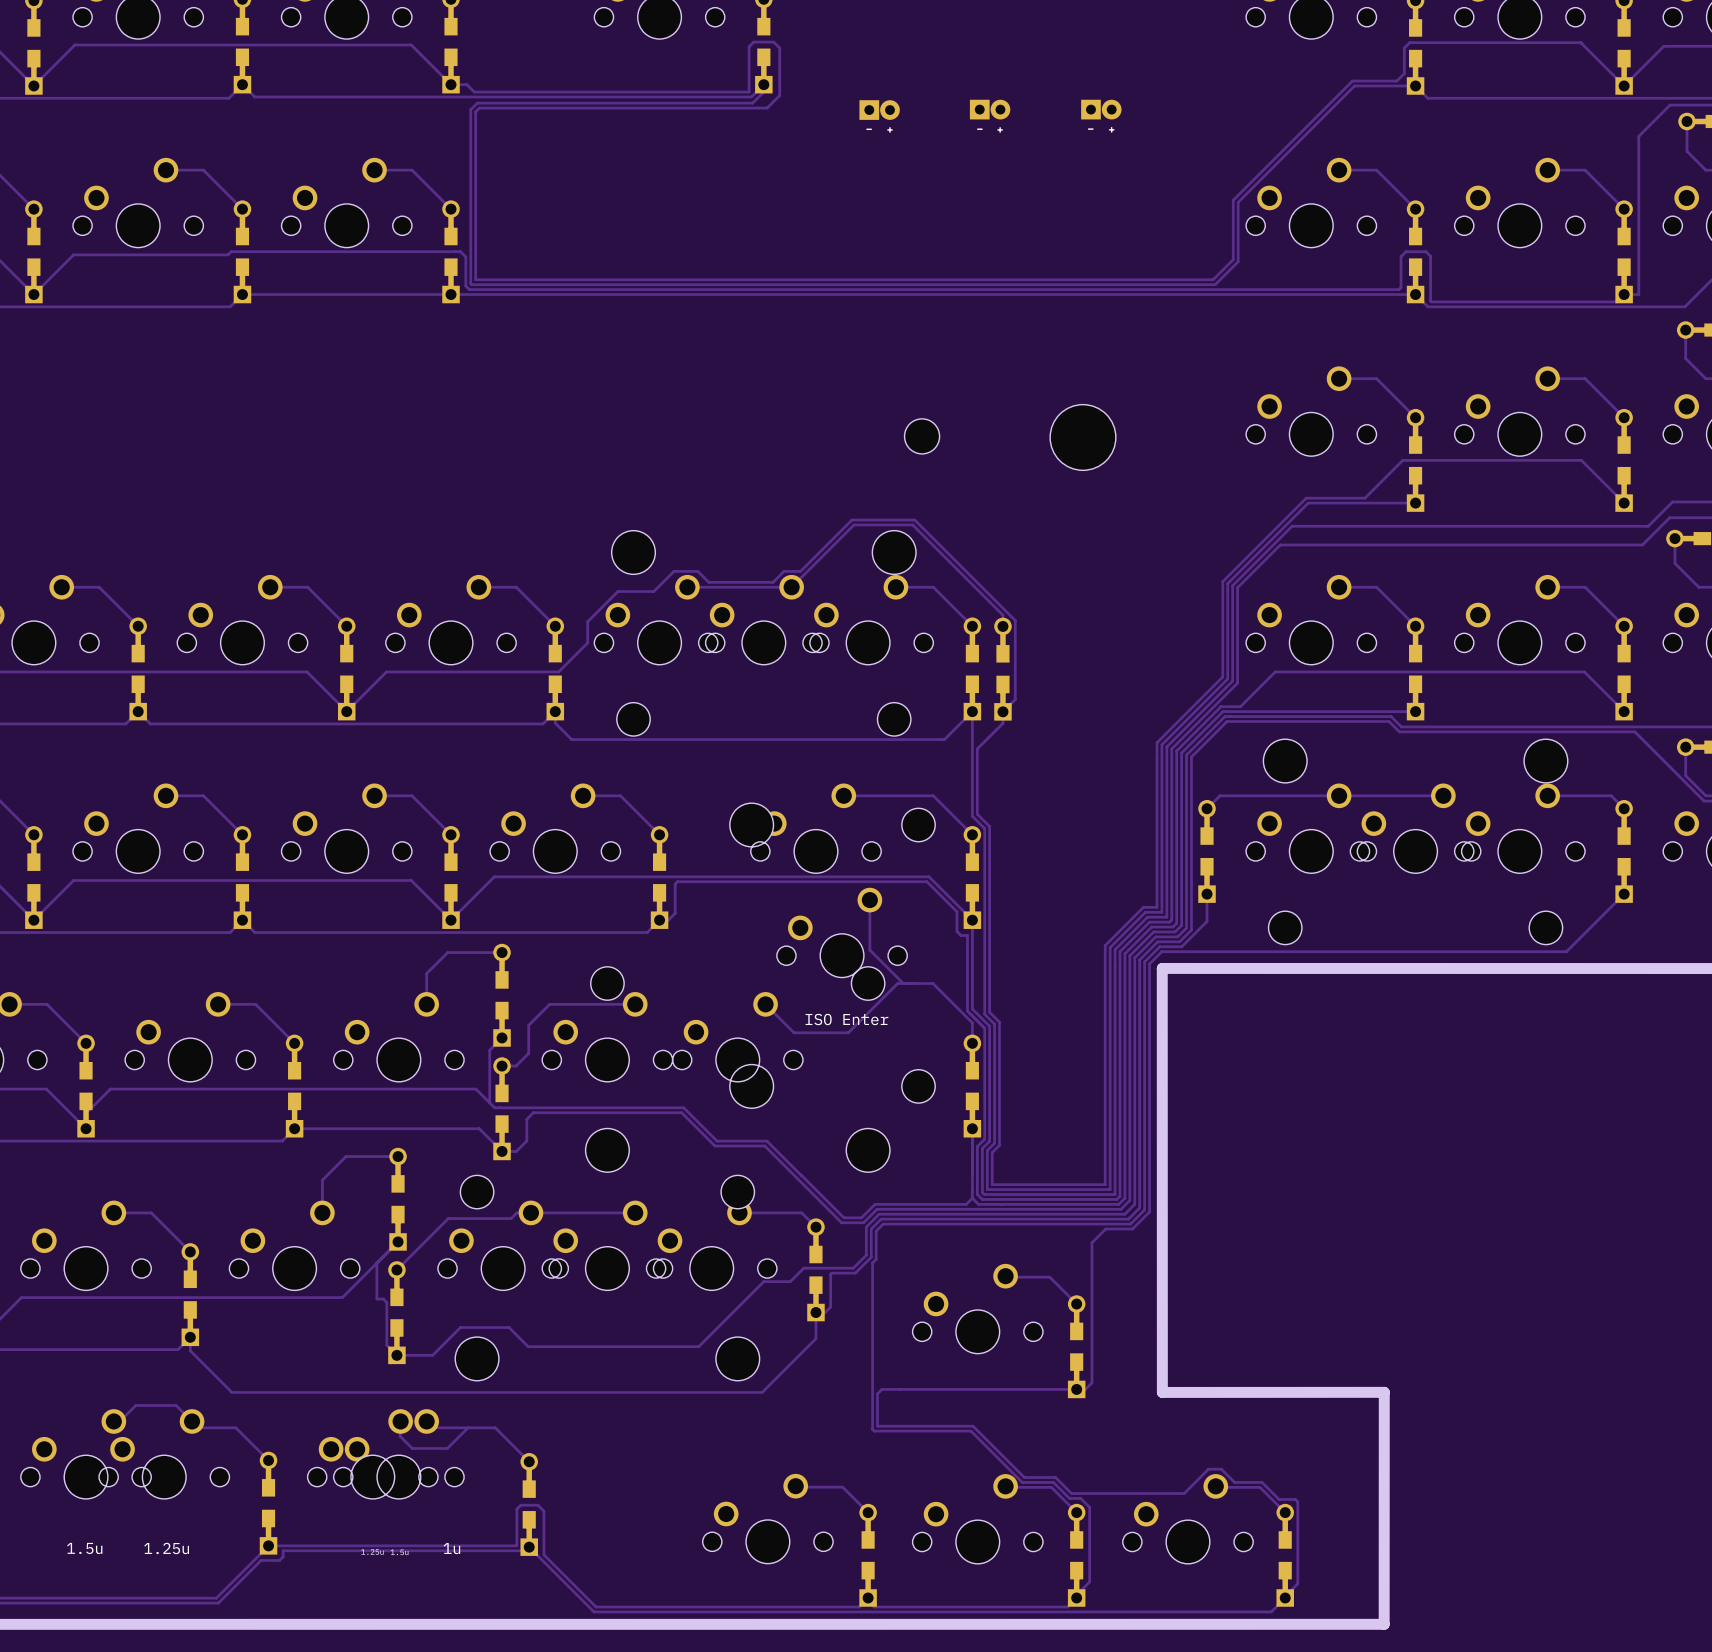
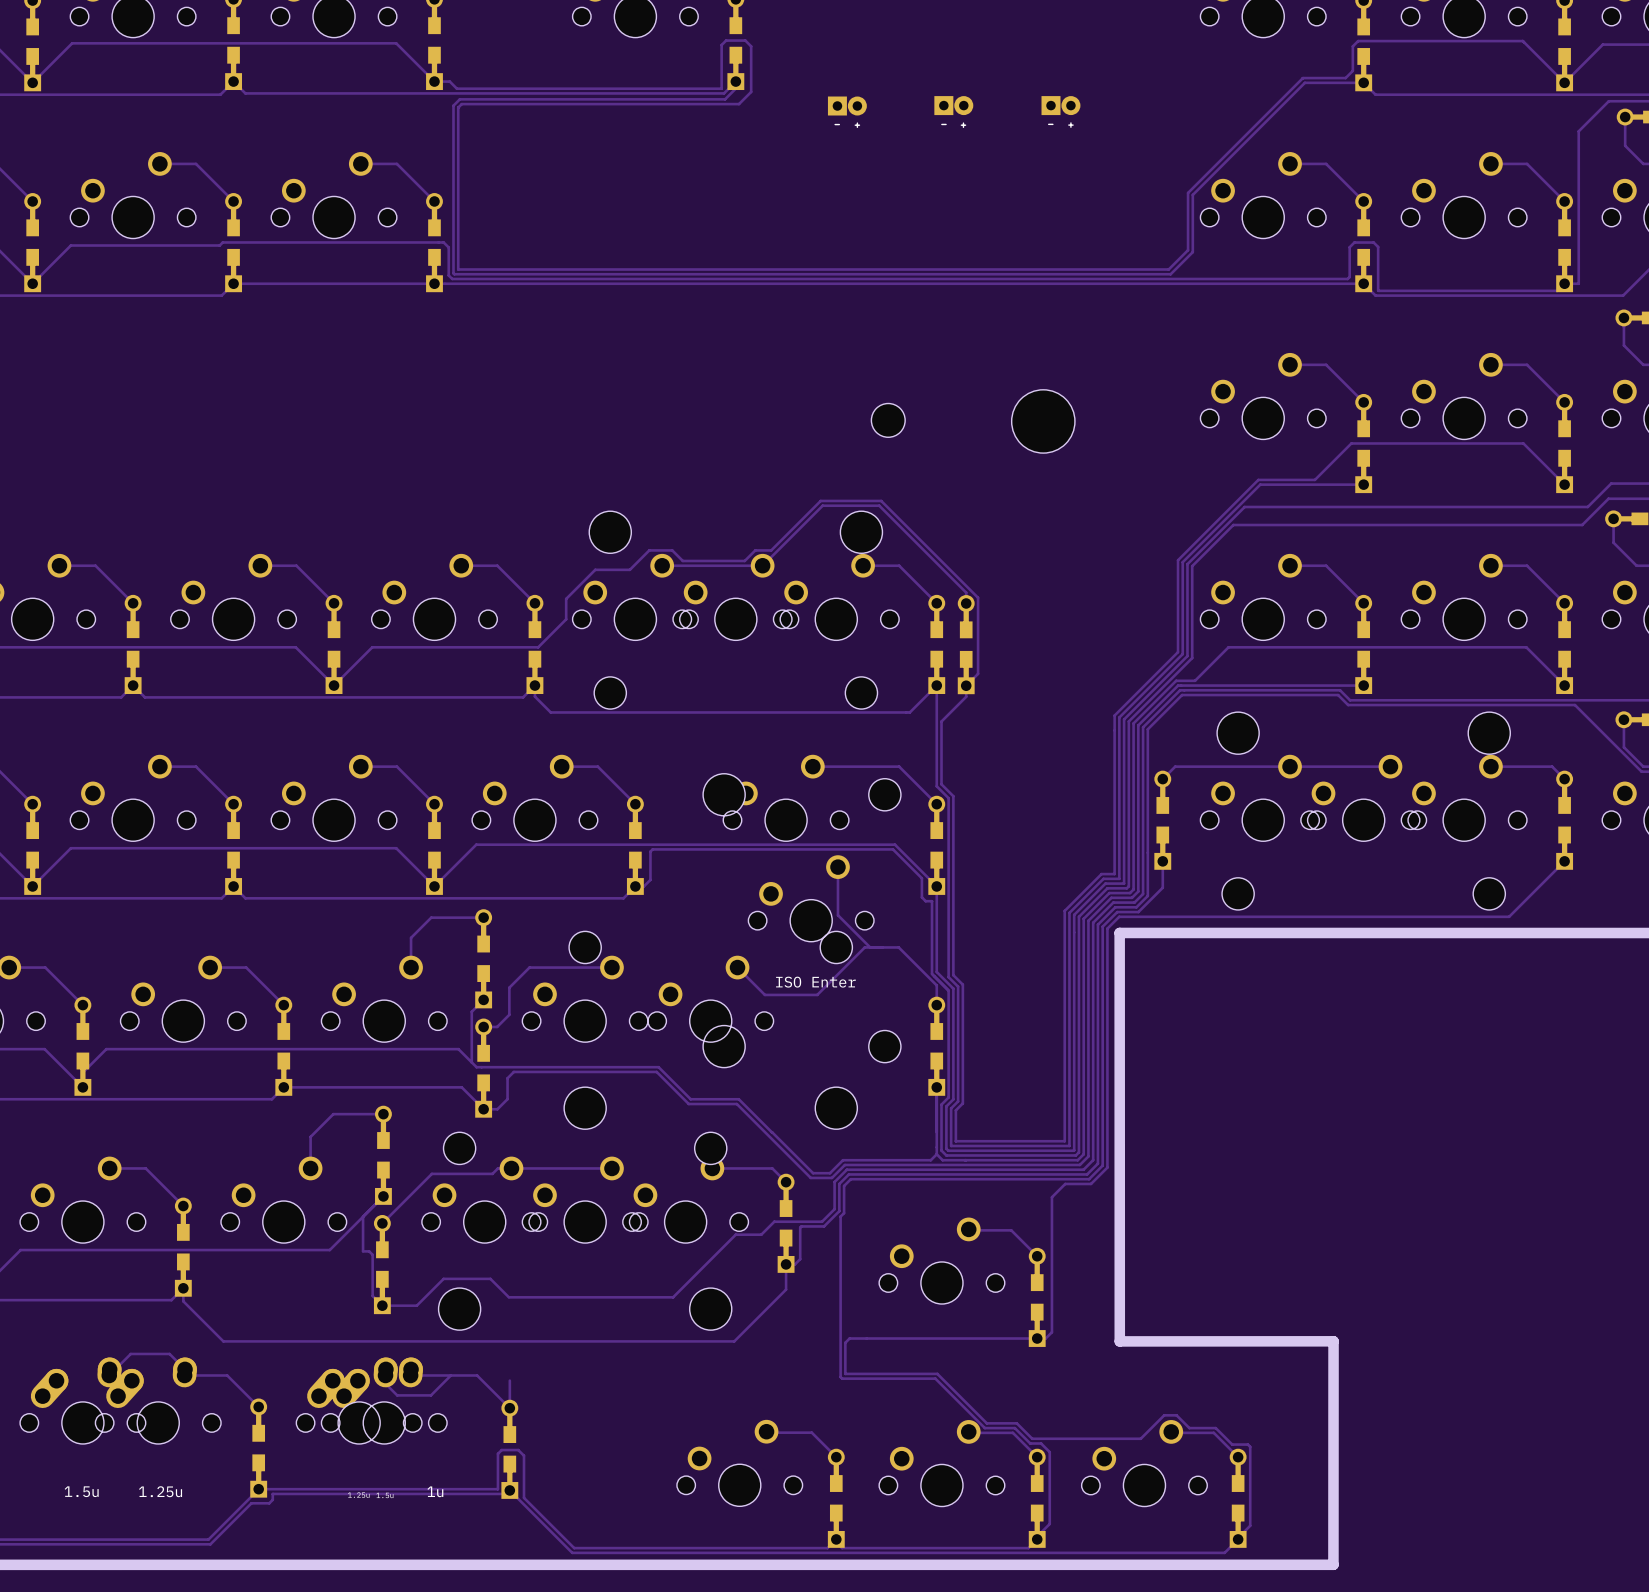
part footprint: [20, 1409, 152, 1499] -> [20, 1357, 146, 1444]
part footprint: [99, 1409, 230, 1499] -> [95, 1357, 222, 1444]
part footprint: [307, 1409, 439, 1499] -> [296, 1357, 422, 1444]
part footprint: [333, 1409, 465, 1499] -> [321, 1357, 448, 1444]
track: none -> (509, 1380) (509, 1408)

